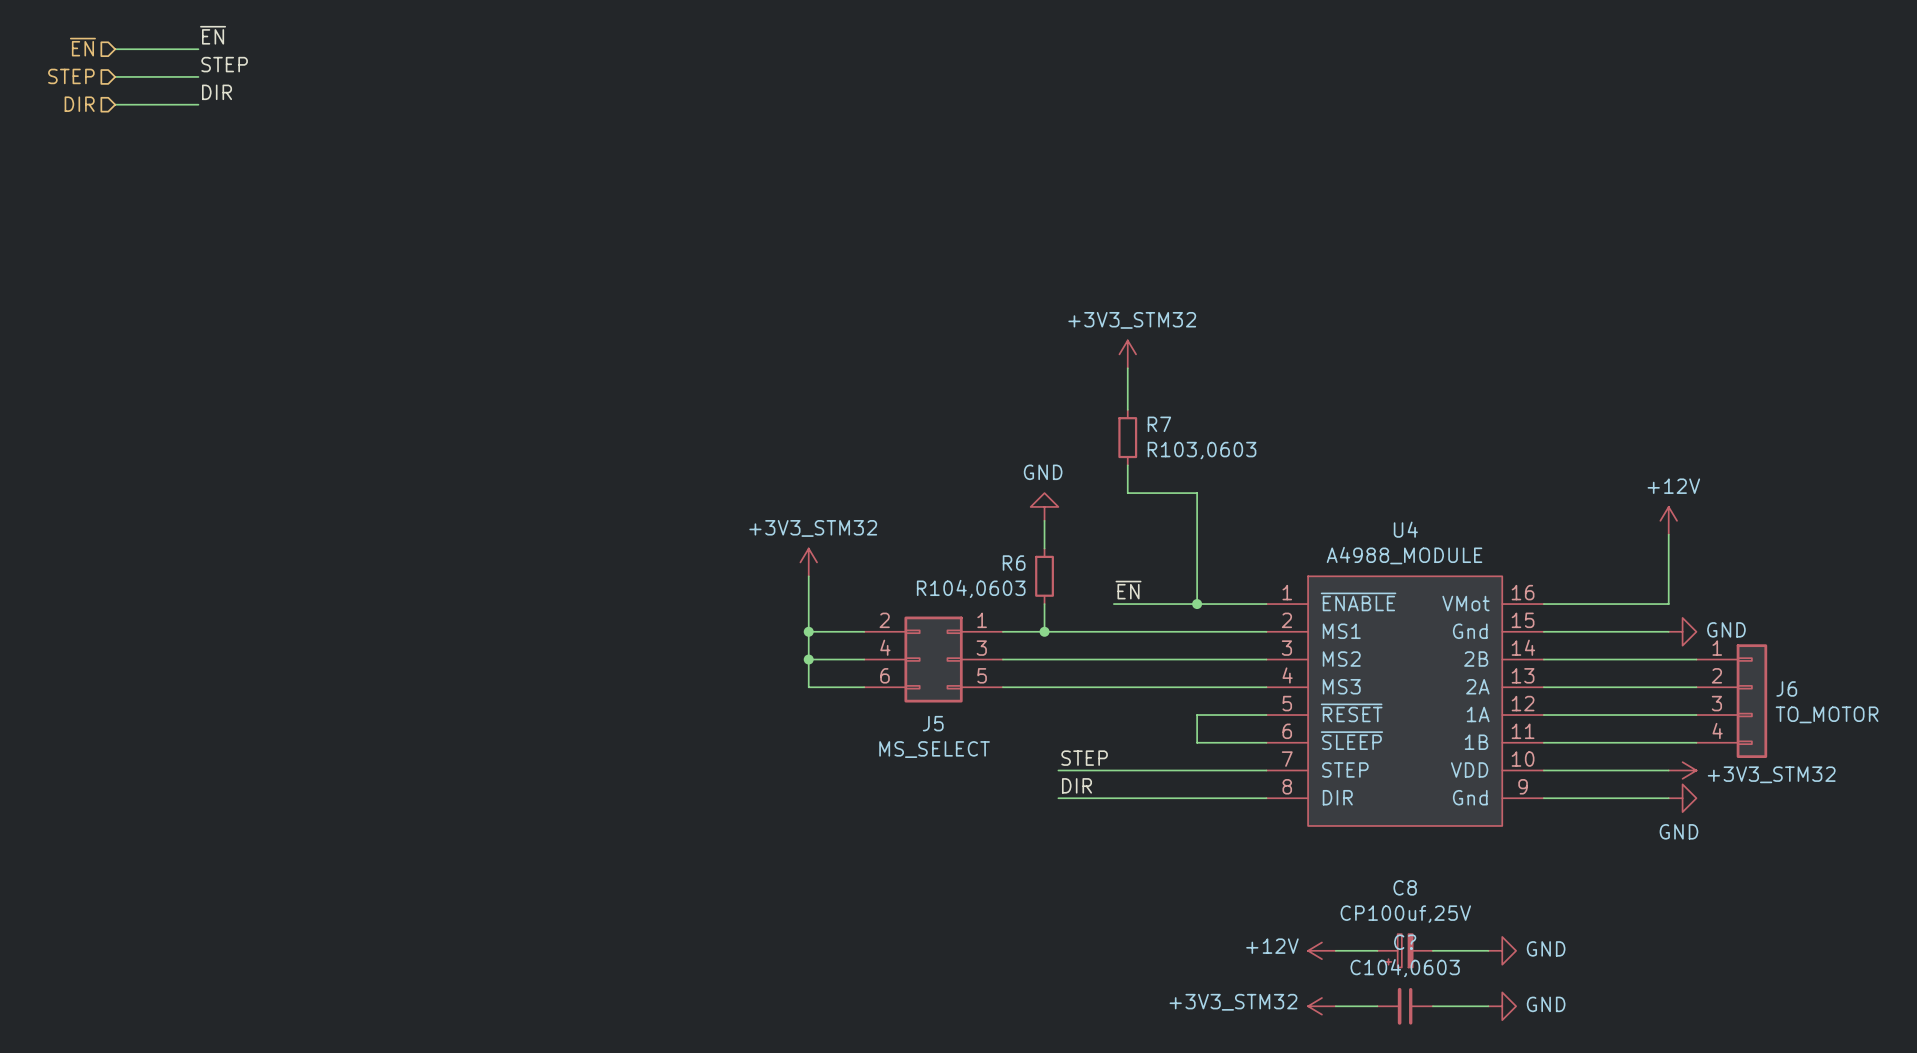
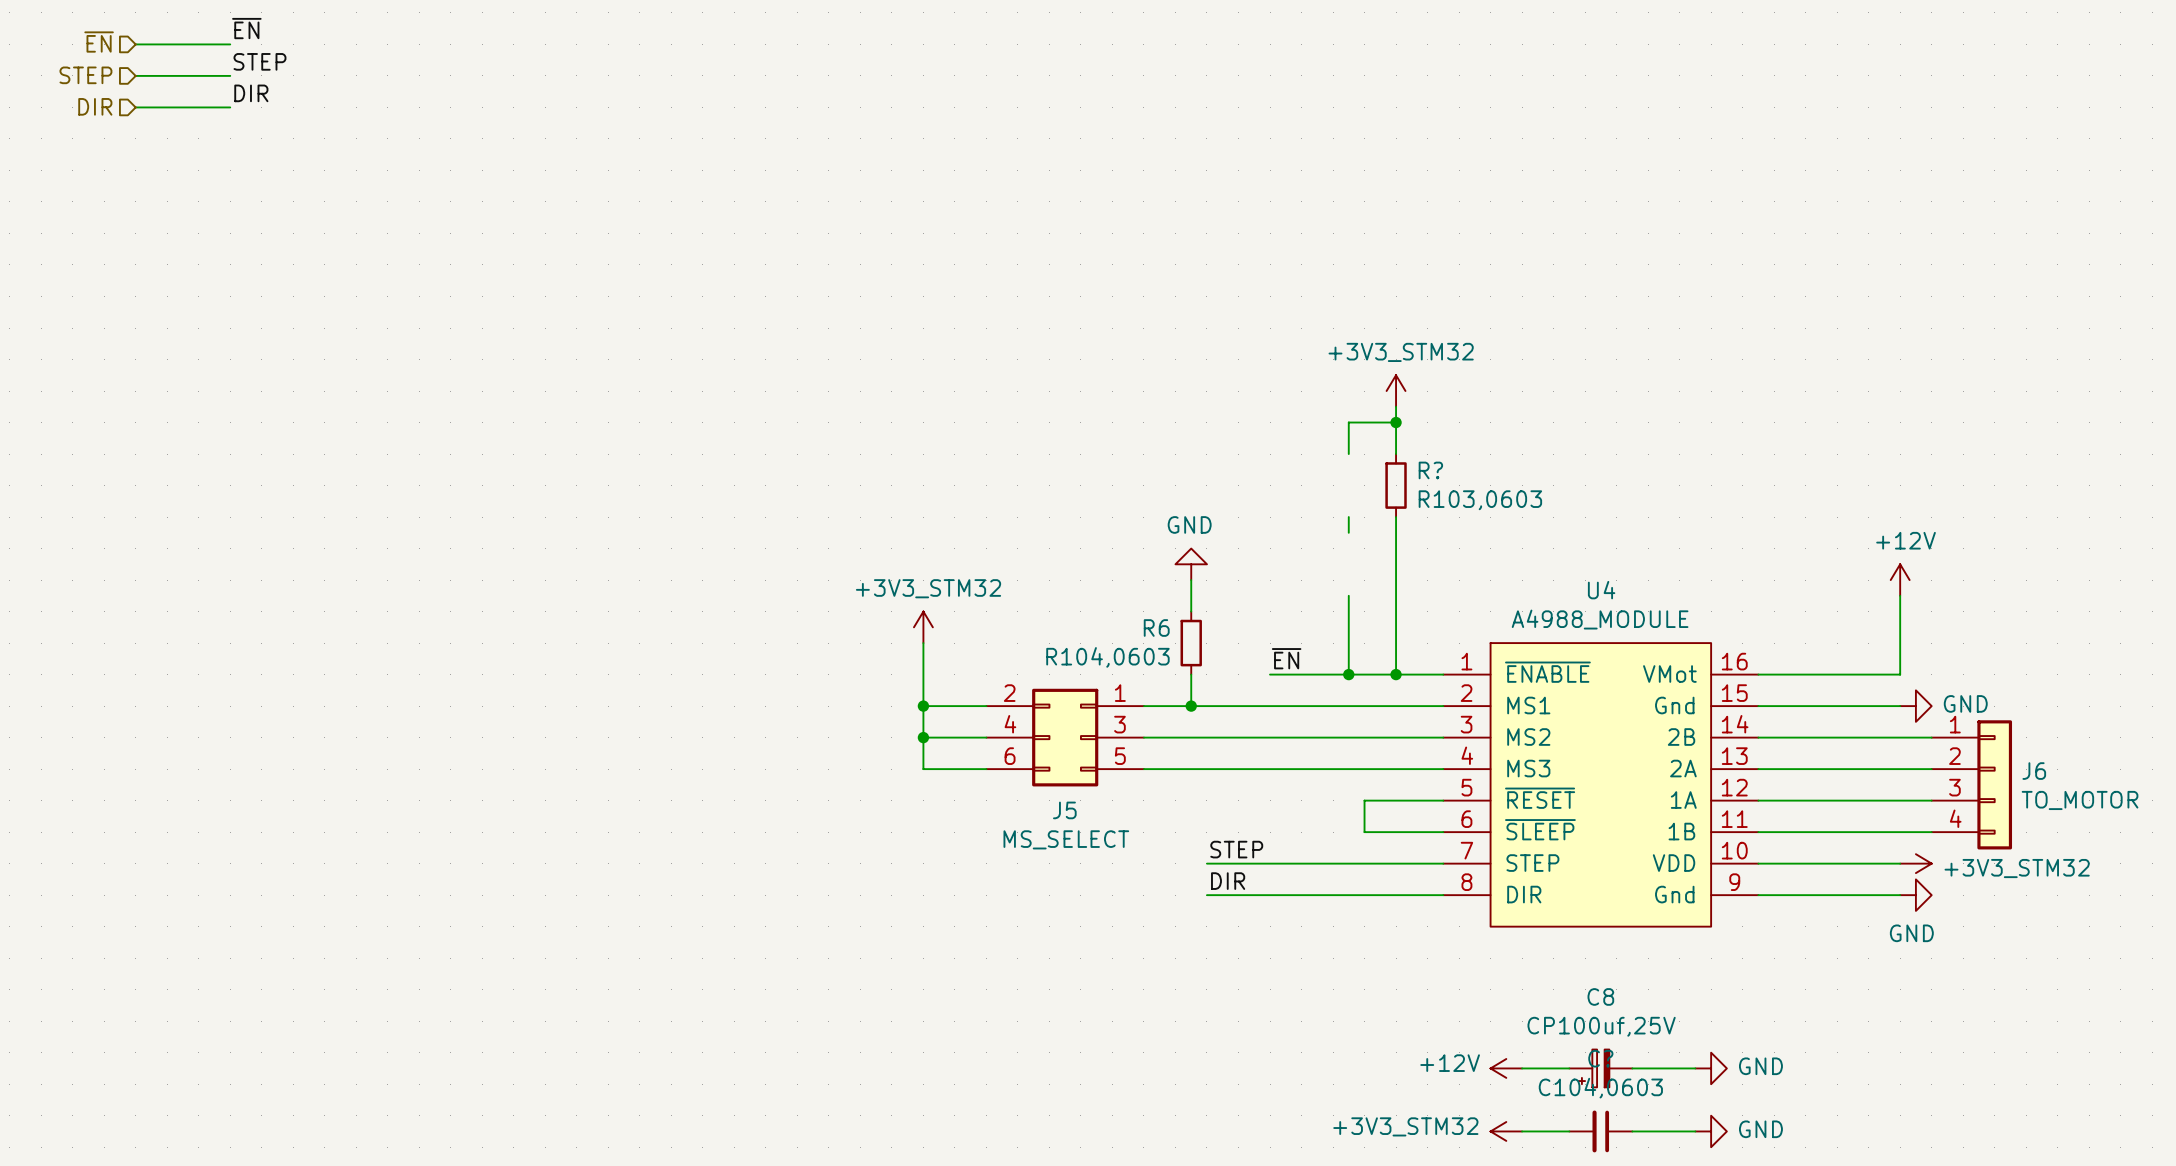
power symbol position: +3V3_STM32 (1127, 354) -> +3V3_STM32 (1396, 391)
wire: (1127, 368) (1127, 409) -> (1396, 406) (1396, 454)
wire: none -> (1396, 422) (1348, 422) (1348, 454)
junction: none -> (1396, 422)
R7: R103,0603 (1127, 437) -> none
R?: none -> R103,0603 (1396, 485)
wire: (1127, 465) (1127, 493) (1197, 493) (1197, 604) -> none
wire: none -> (1348, 517) (1348, 532)
wire: none -> (1396, 517) (1396, 674)
wire: none -> (1348, 595) (1348, 674)
junction: none -> (1348, 674)
junction: (1197, 604) -> none
junction: none -> (1396, 674)

